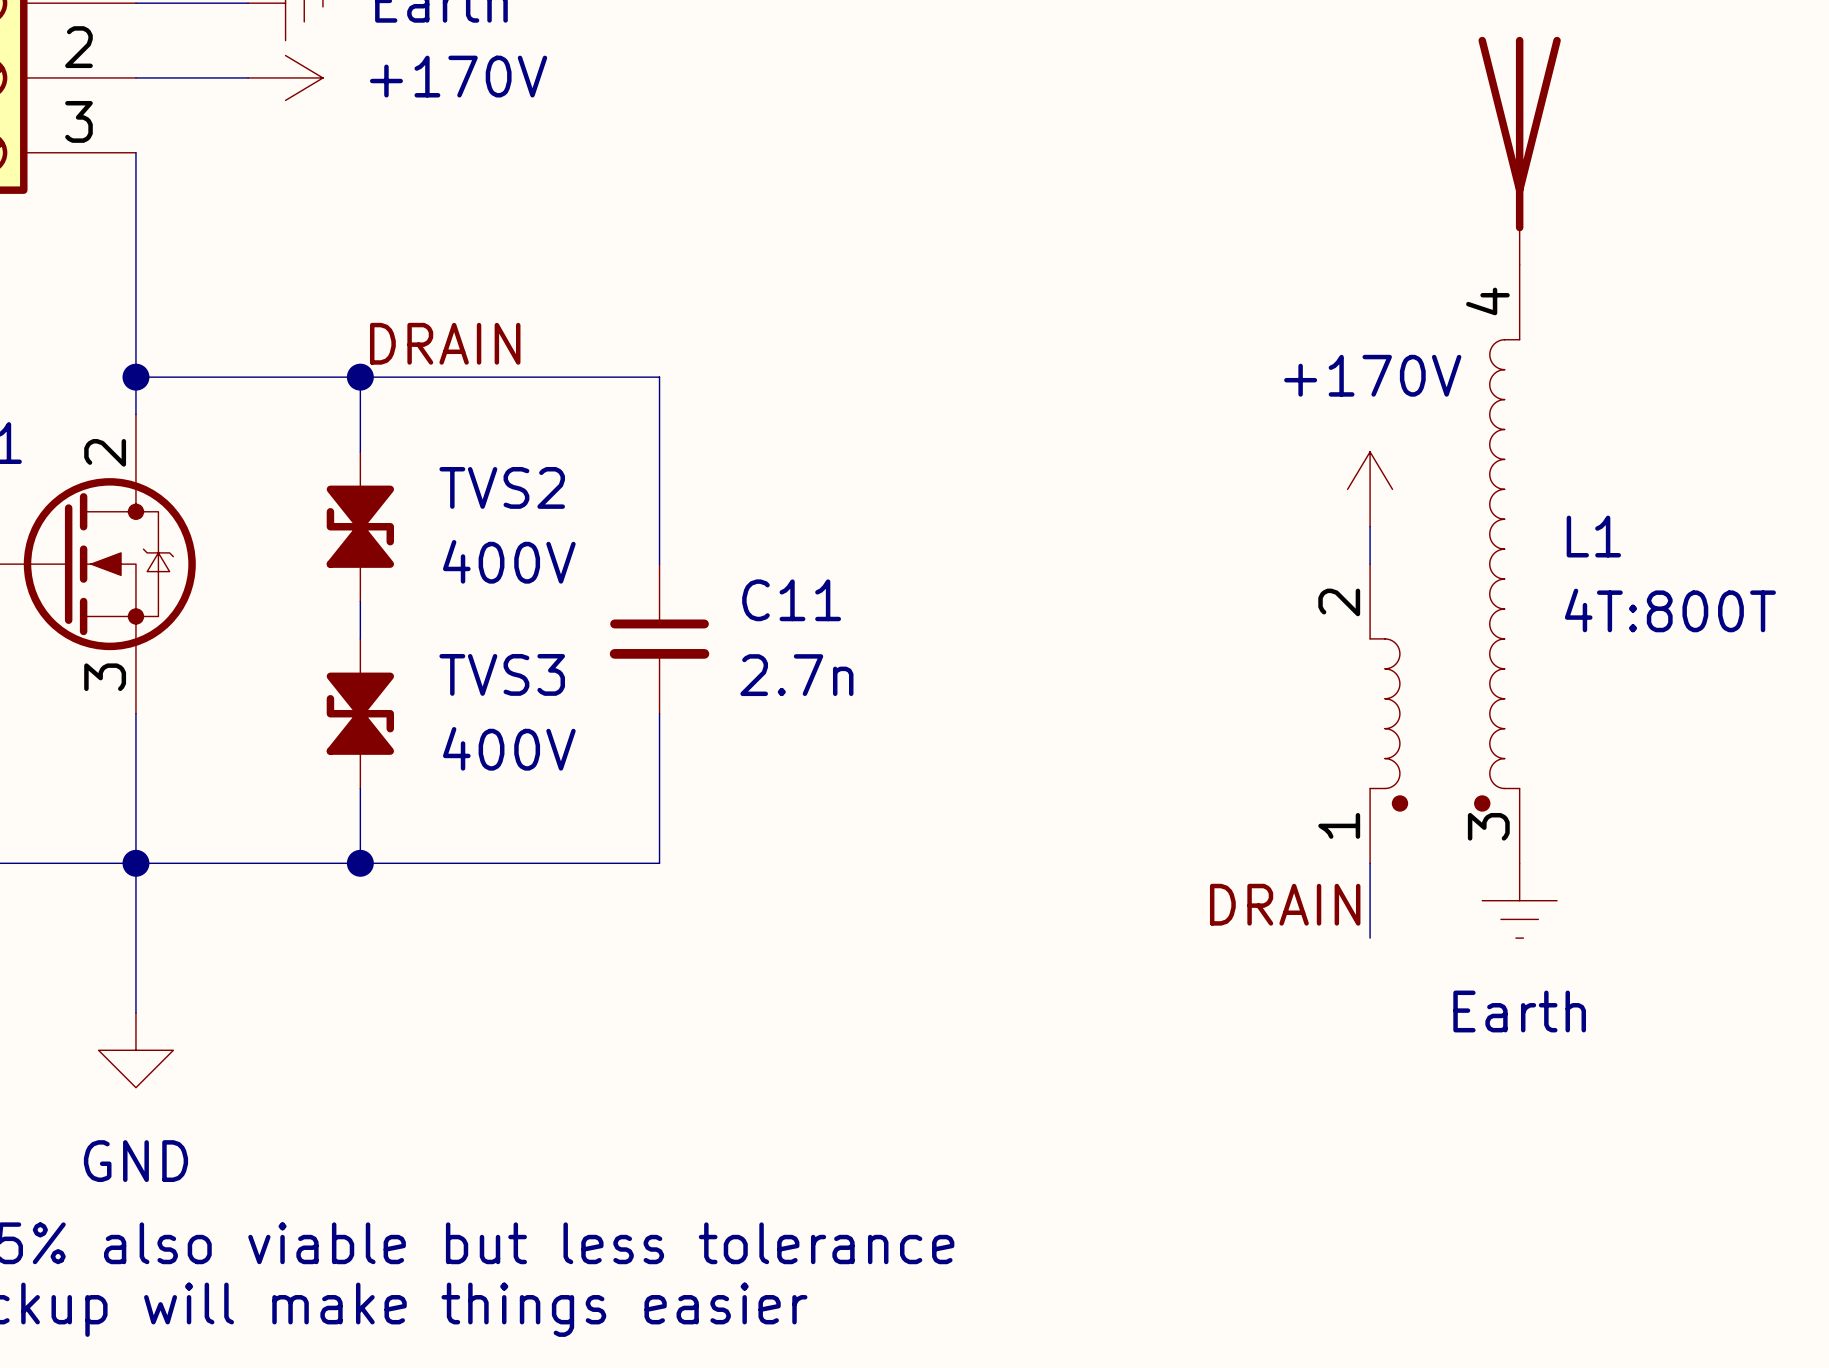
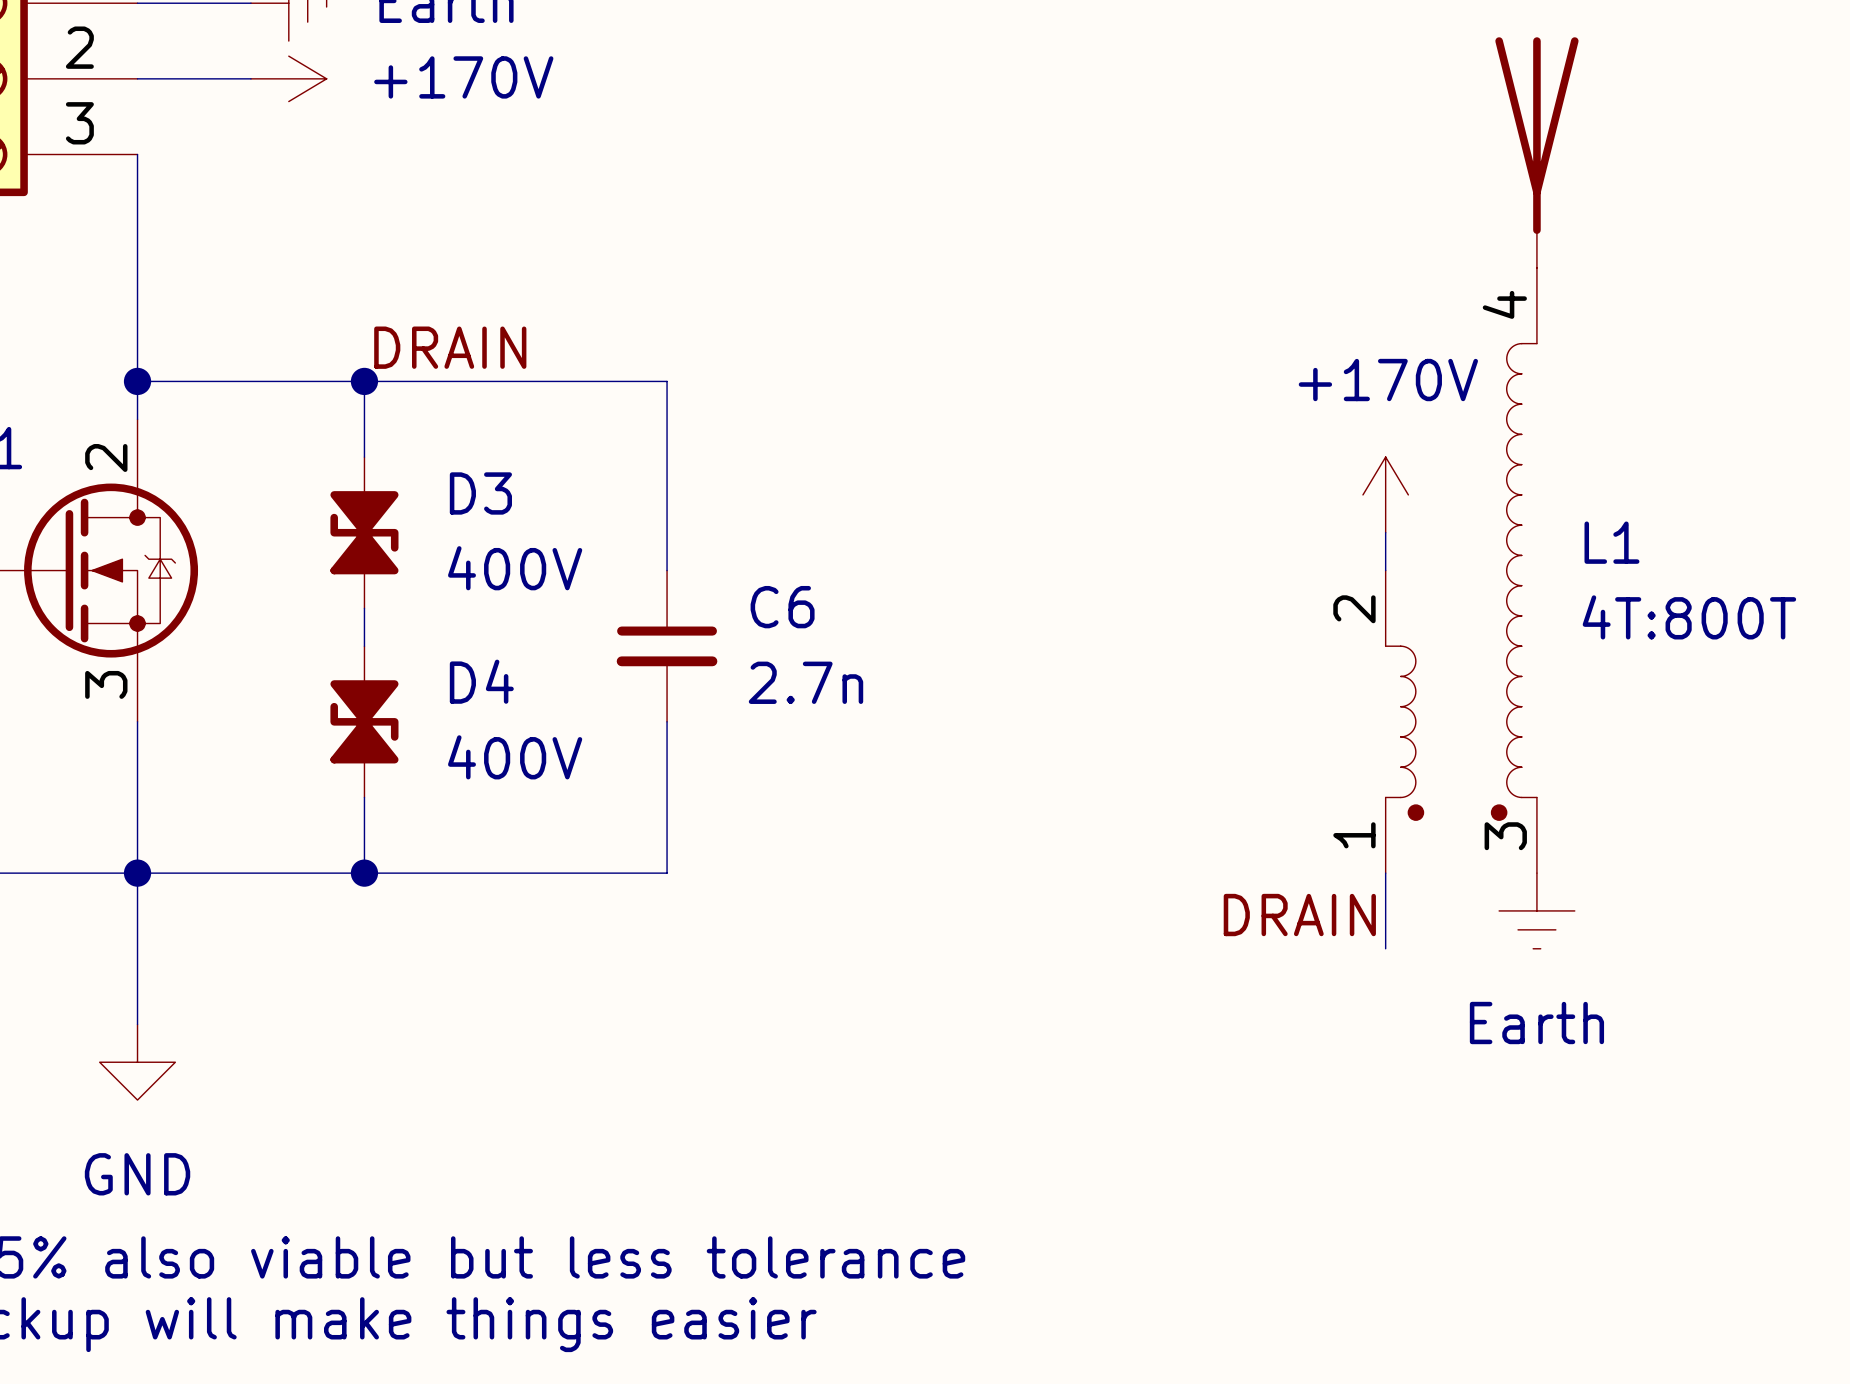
TVS2 name: TVS2 (502, 487) -> D3 (480, 493)
C11 name: C11 (791, 600) -> C6 (782, 607)
TVS3 name: TVS3 (502, 674) -> D4 (481, 681)

